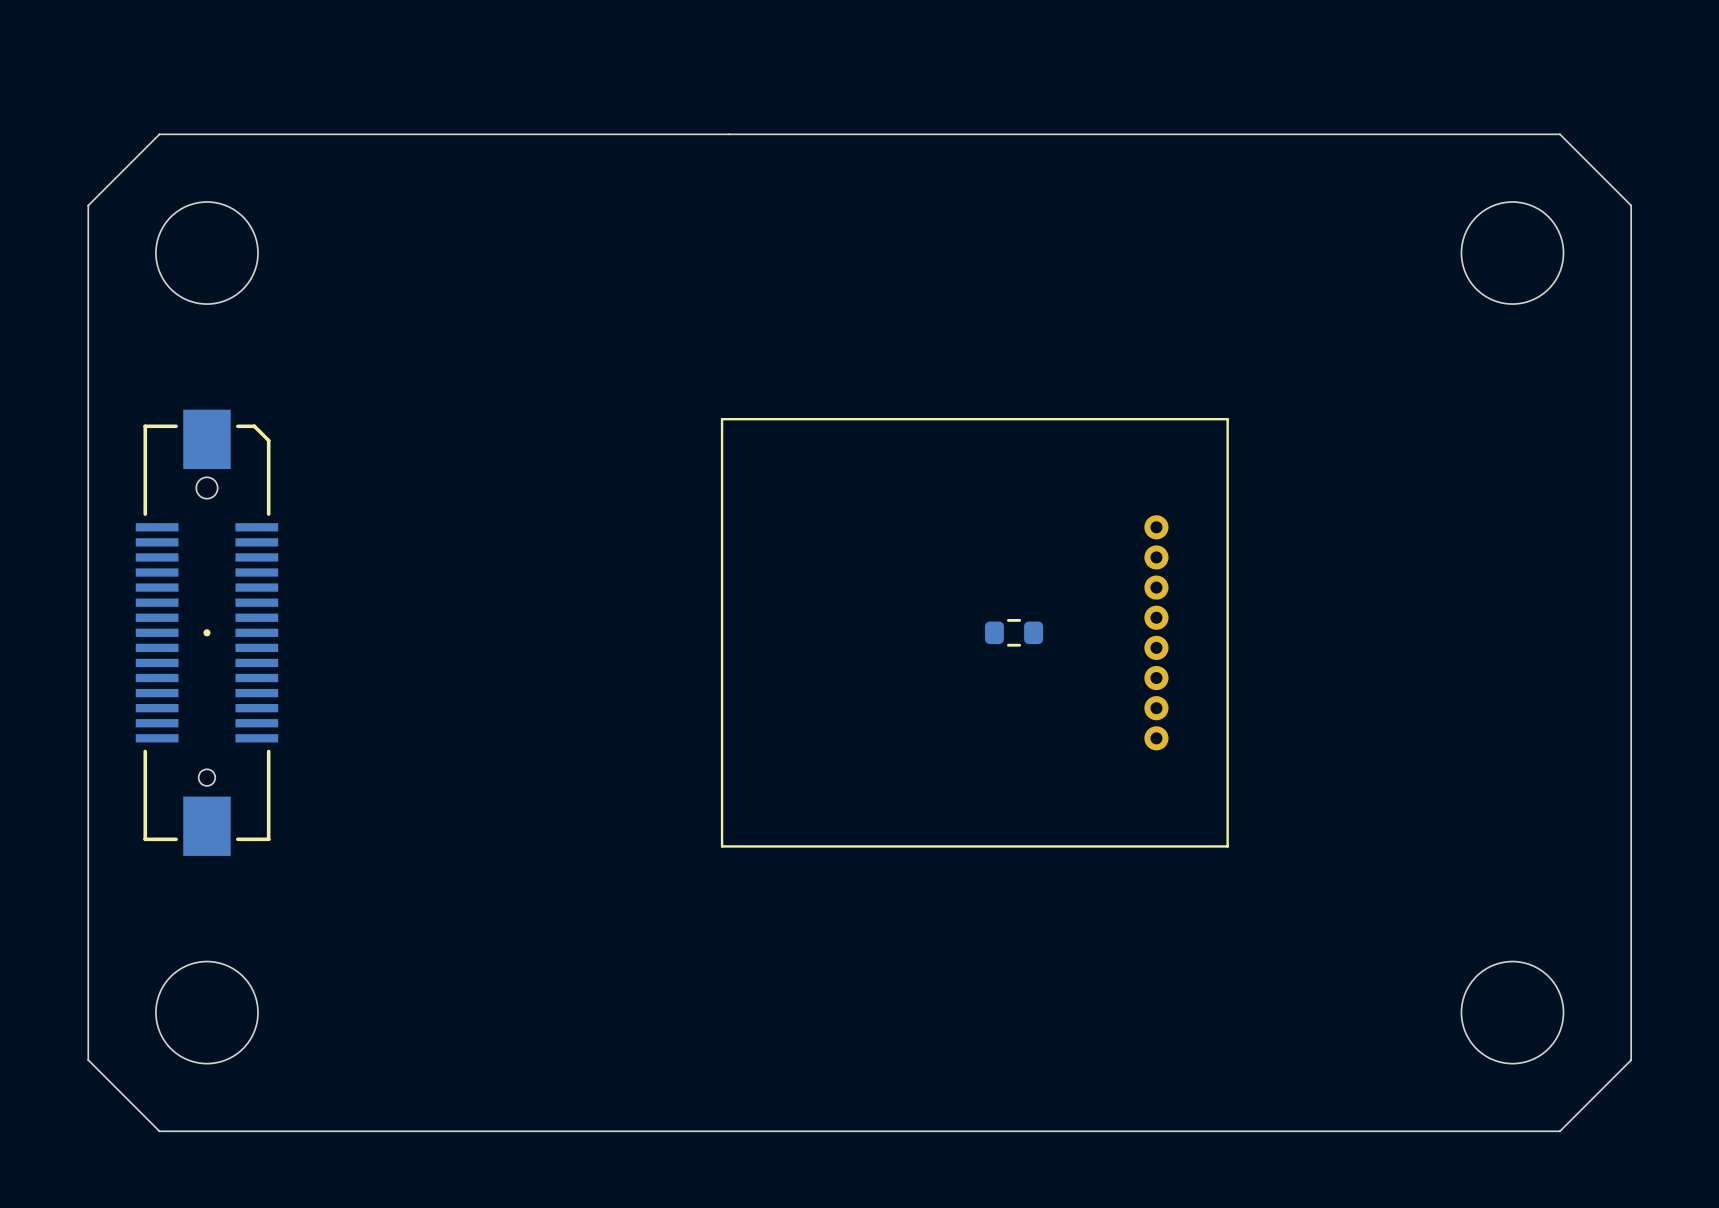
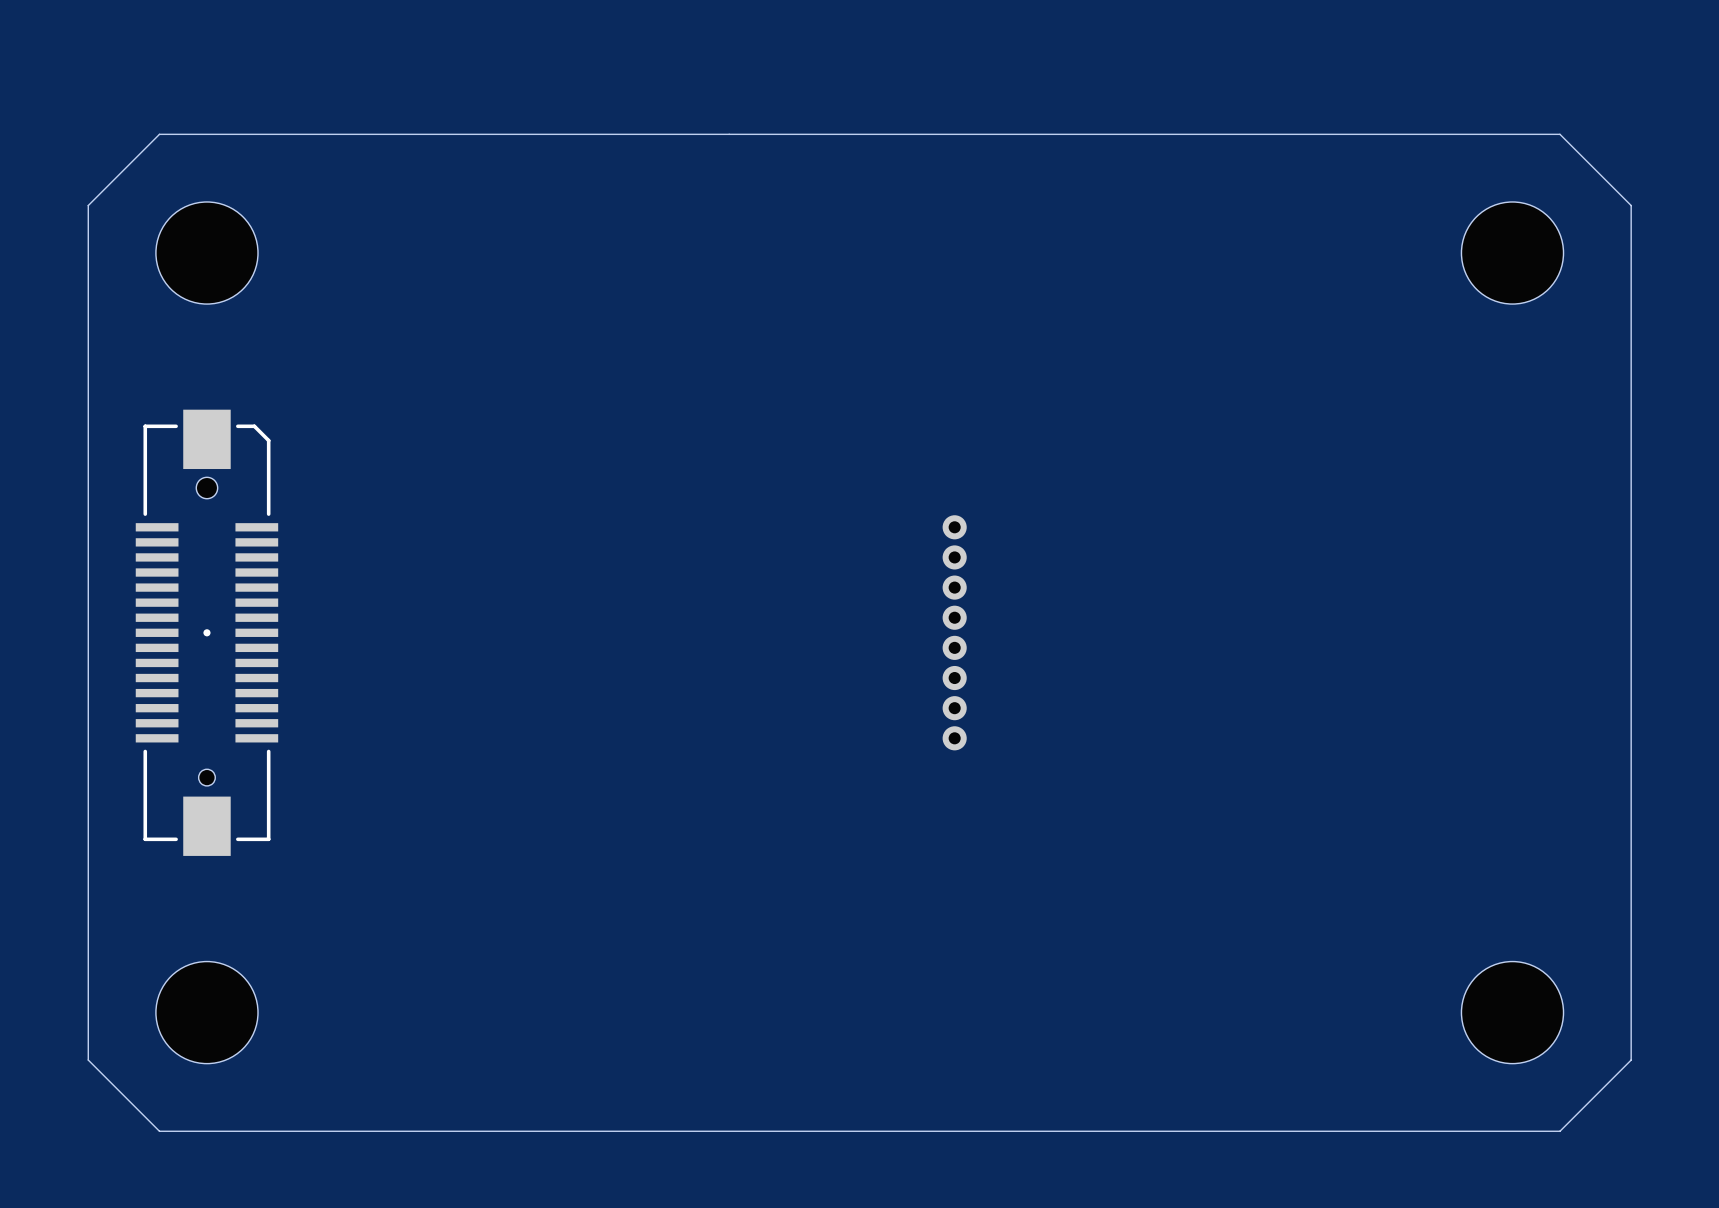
line: (1227, 419) (1227, 846) (722, 846) (722, 419) (1227, 419) -> none
part: (1014, 632) -> none
part position: (1156, 632) -> (954, 632)

